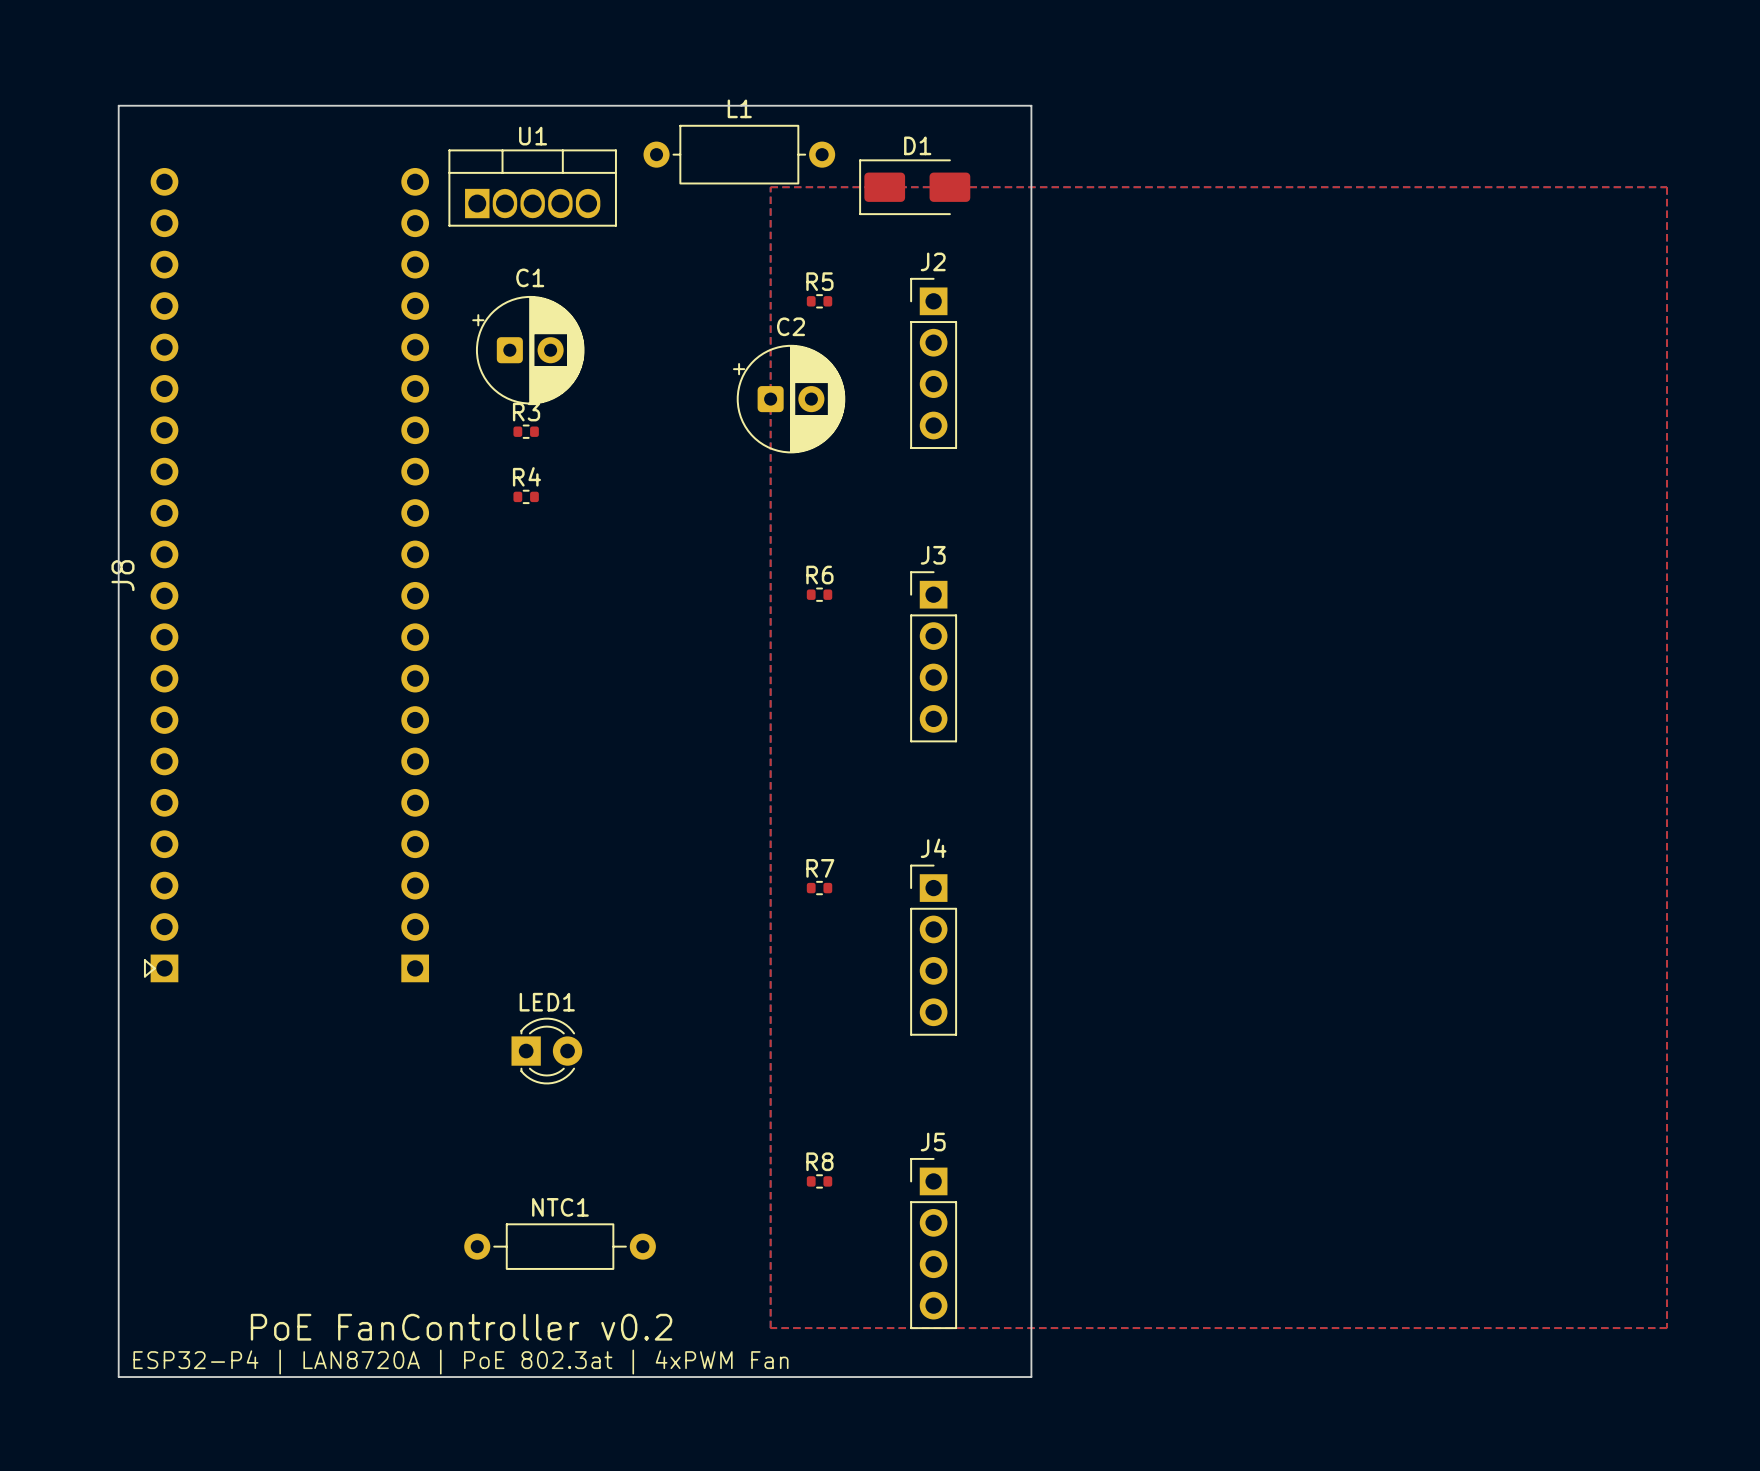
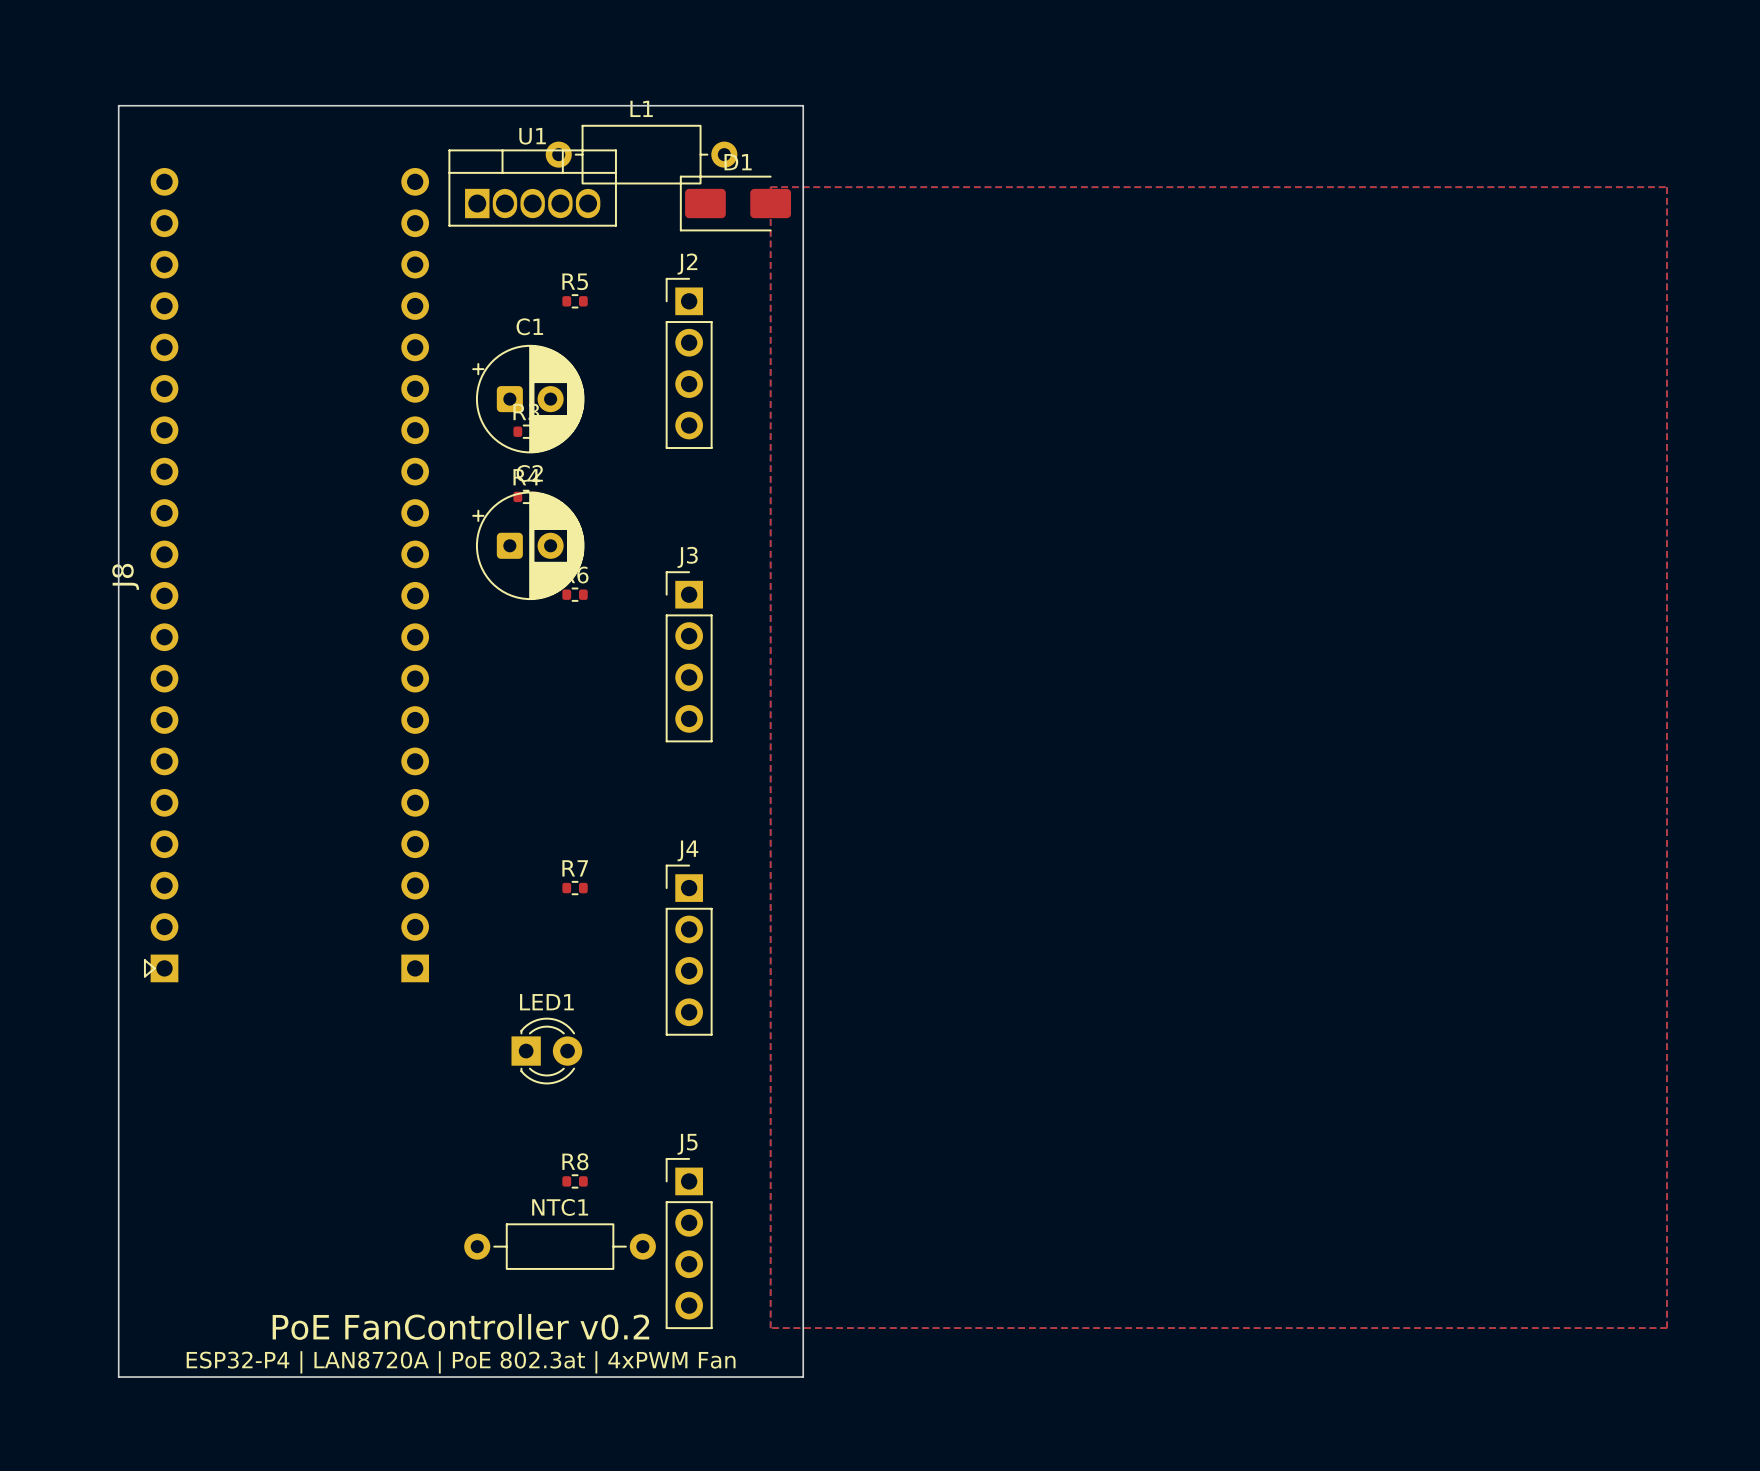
board edge: (803, 105) (1031, 105) (1031, 1377) (803, 1377) -> (803, 105) (803, 1377)
L1 position: (739, 154) -> (641, 154)
D1 position: (914, 187) -> (735, 203)
R5 position: (819, 301) -> (575, 301)
C1 position: (528, 350) -> (528, 399)
J2 position: (933, 363) -> (689, 363)
C2 position: (789, 399) -> (528, 545)
R6 position: (819, 594) -> (575, 594)
J3 position: (933, 656) -> (689, 656)
R7 position: (819, 888) -> (575, 888)
J4 position: (933, 950) -> (689, 950)
R8 position: (819, 1181) -> (575, 1181)
J5 position: (933, 1243) -> (689, 1243)

